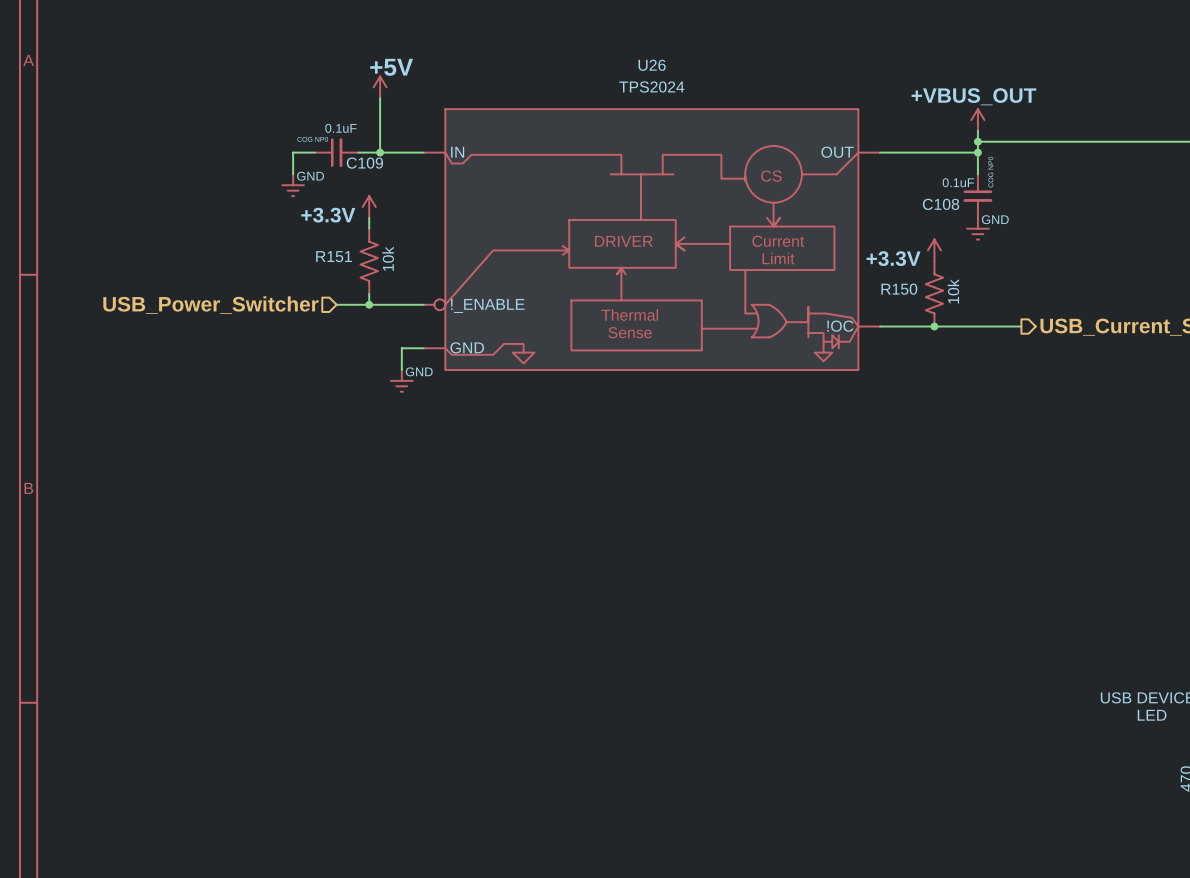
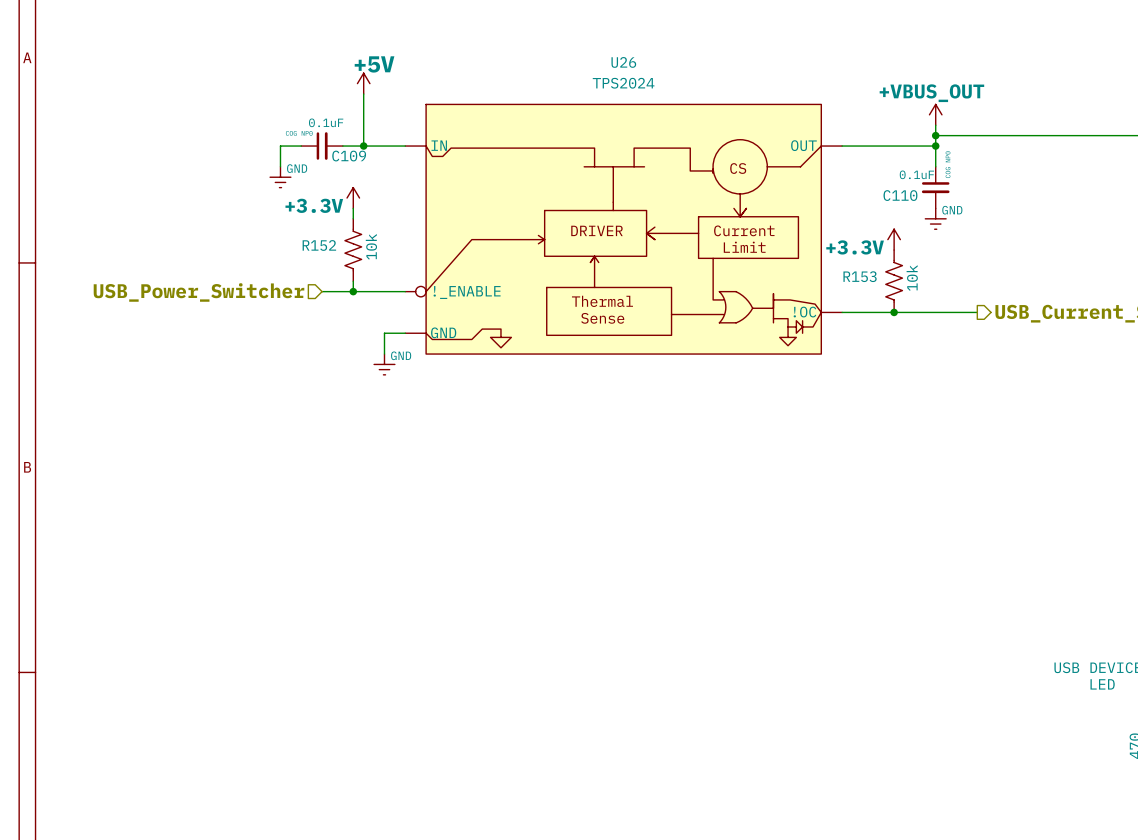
C108 name: C108 (941, 204) -> C110 (900, 195)
R151 name: R151 (334, 256) -> R152 (319, 245)
R150 name: R150 (899, 289) -> R153 (860, 276)

